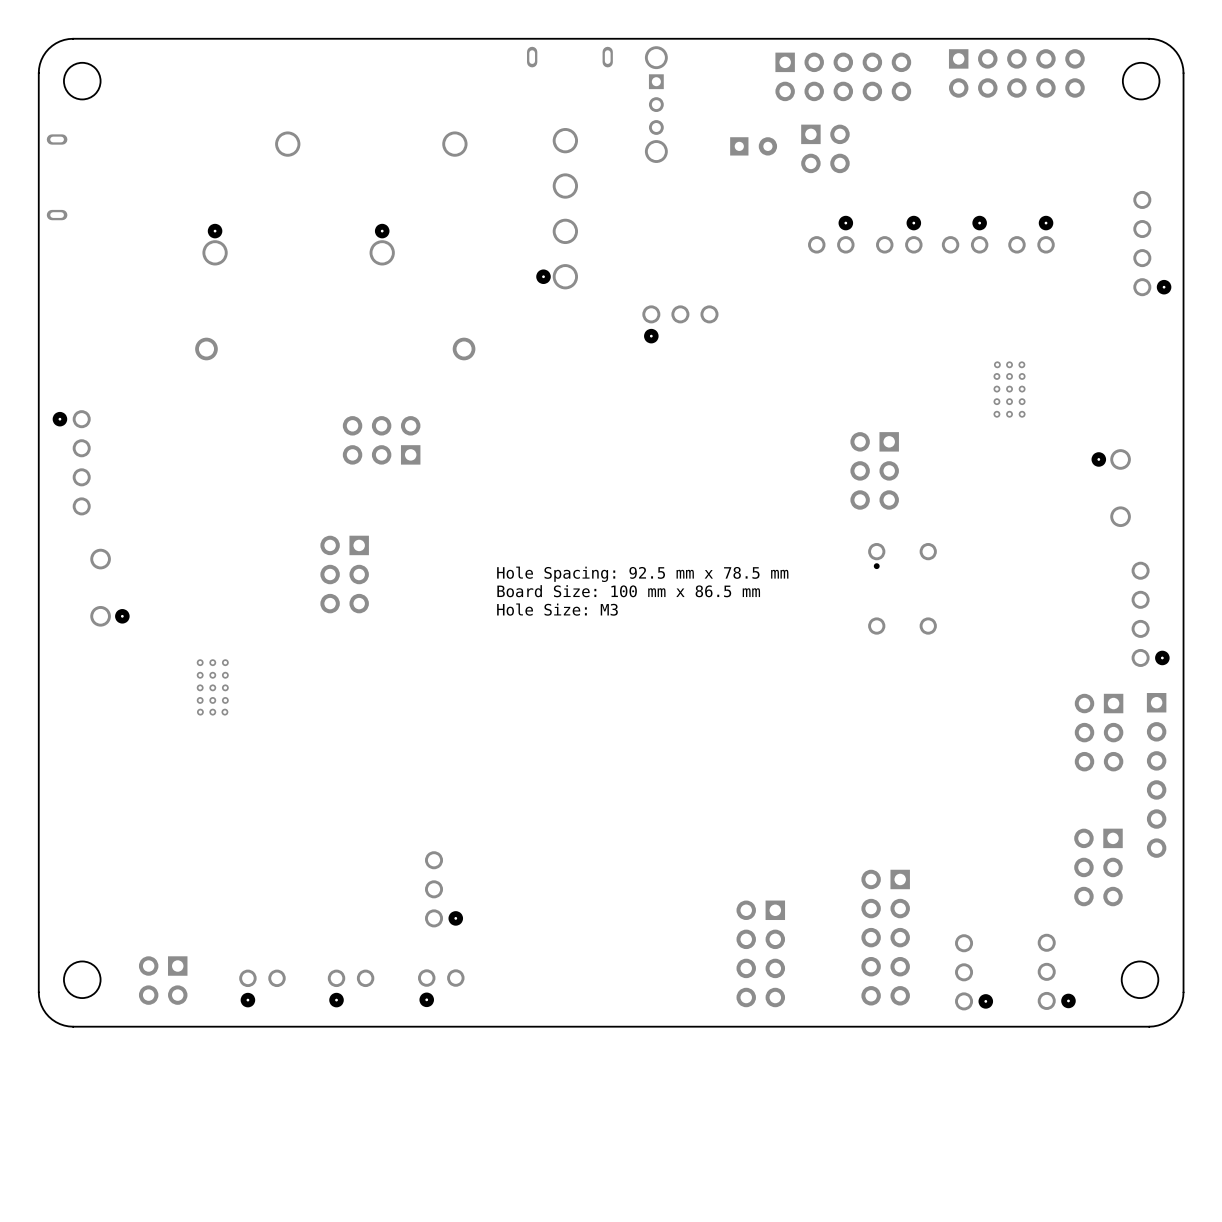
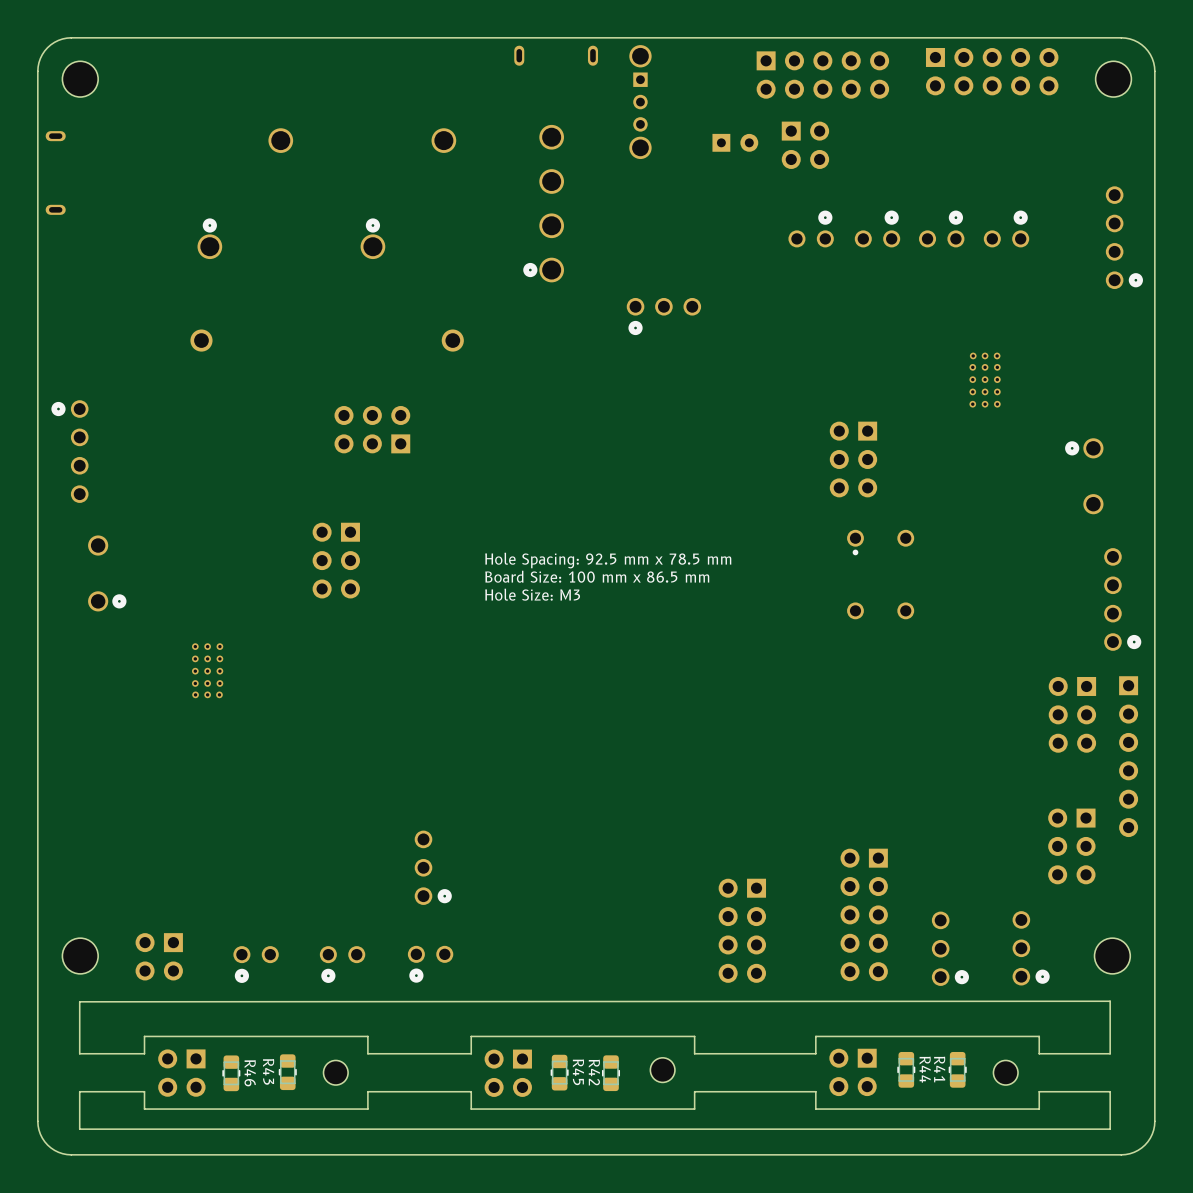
board edge: (1183, 992) (1180, 1005) (1173, 1016) (1162, 1024) (1149, 1026) (73, 1026) (59, 1024) (48, 1016) (41, 1005) (38, 992) -> (1154, 968) (1154, 1125) (1150, 1138) (1141, 1147) (1130, 1153) (1121, 1154) (66, 1154) (54, 1150) (47, 1145) (40, 1134) (38, 1125) (37, 968)
board edge: none -> (1110, 1001) (1110, 1053) (1039, 1053) (1039, 1036) (815, 1036) (815, 1053) (694, 1053) (694, 1036) (471, 1036) (471, 1053) (367, 1053) (367, 1036) (144, 1036) (144, 1053) (79, 1053) (79, 1001) (1110, 1001)
part: none -> (662, 1070)
R44: none -> (906, 1069)
R41: none -> (957, 1069)
R43: none -> (287, 1072)
part: none -> (181, 1073)
R46: none -> (231, 1073)
part: none -> (335, 1072)
part: none -> (508, 1073)
R45: none -> (559, 1072)
R42: none -> (611, 1073)
part: none -> (853, 1072)
part: none -> (1005, 1072)
board edge: none -> (1110, 1091) (1110, 1129) (79, 1129) (79, 1091) (144, 1091) (144, 1109) (367, 1109) (367, 1091) (471, 1091) (471, 1109) (694, 1109) (694, 1091) (815, 1091) (815, 1109) (1039, 1109) (1039, 1091) (1110, 1091)

